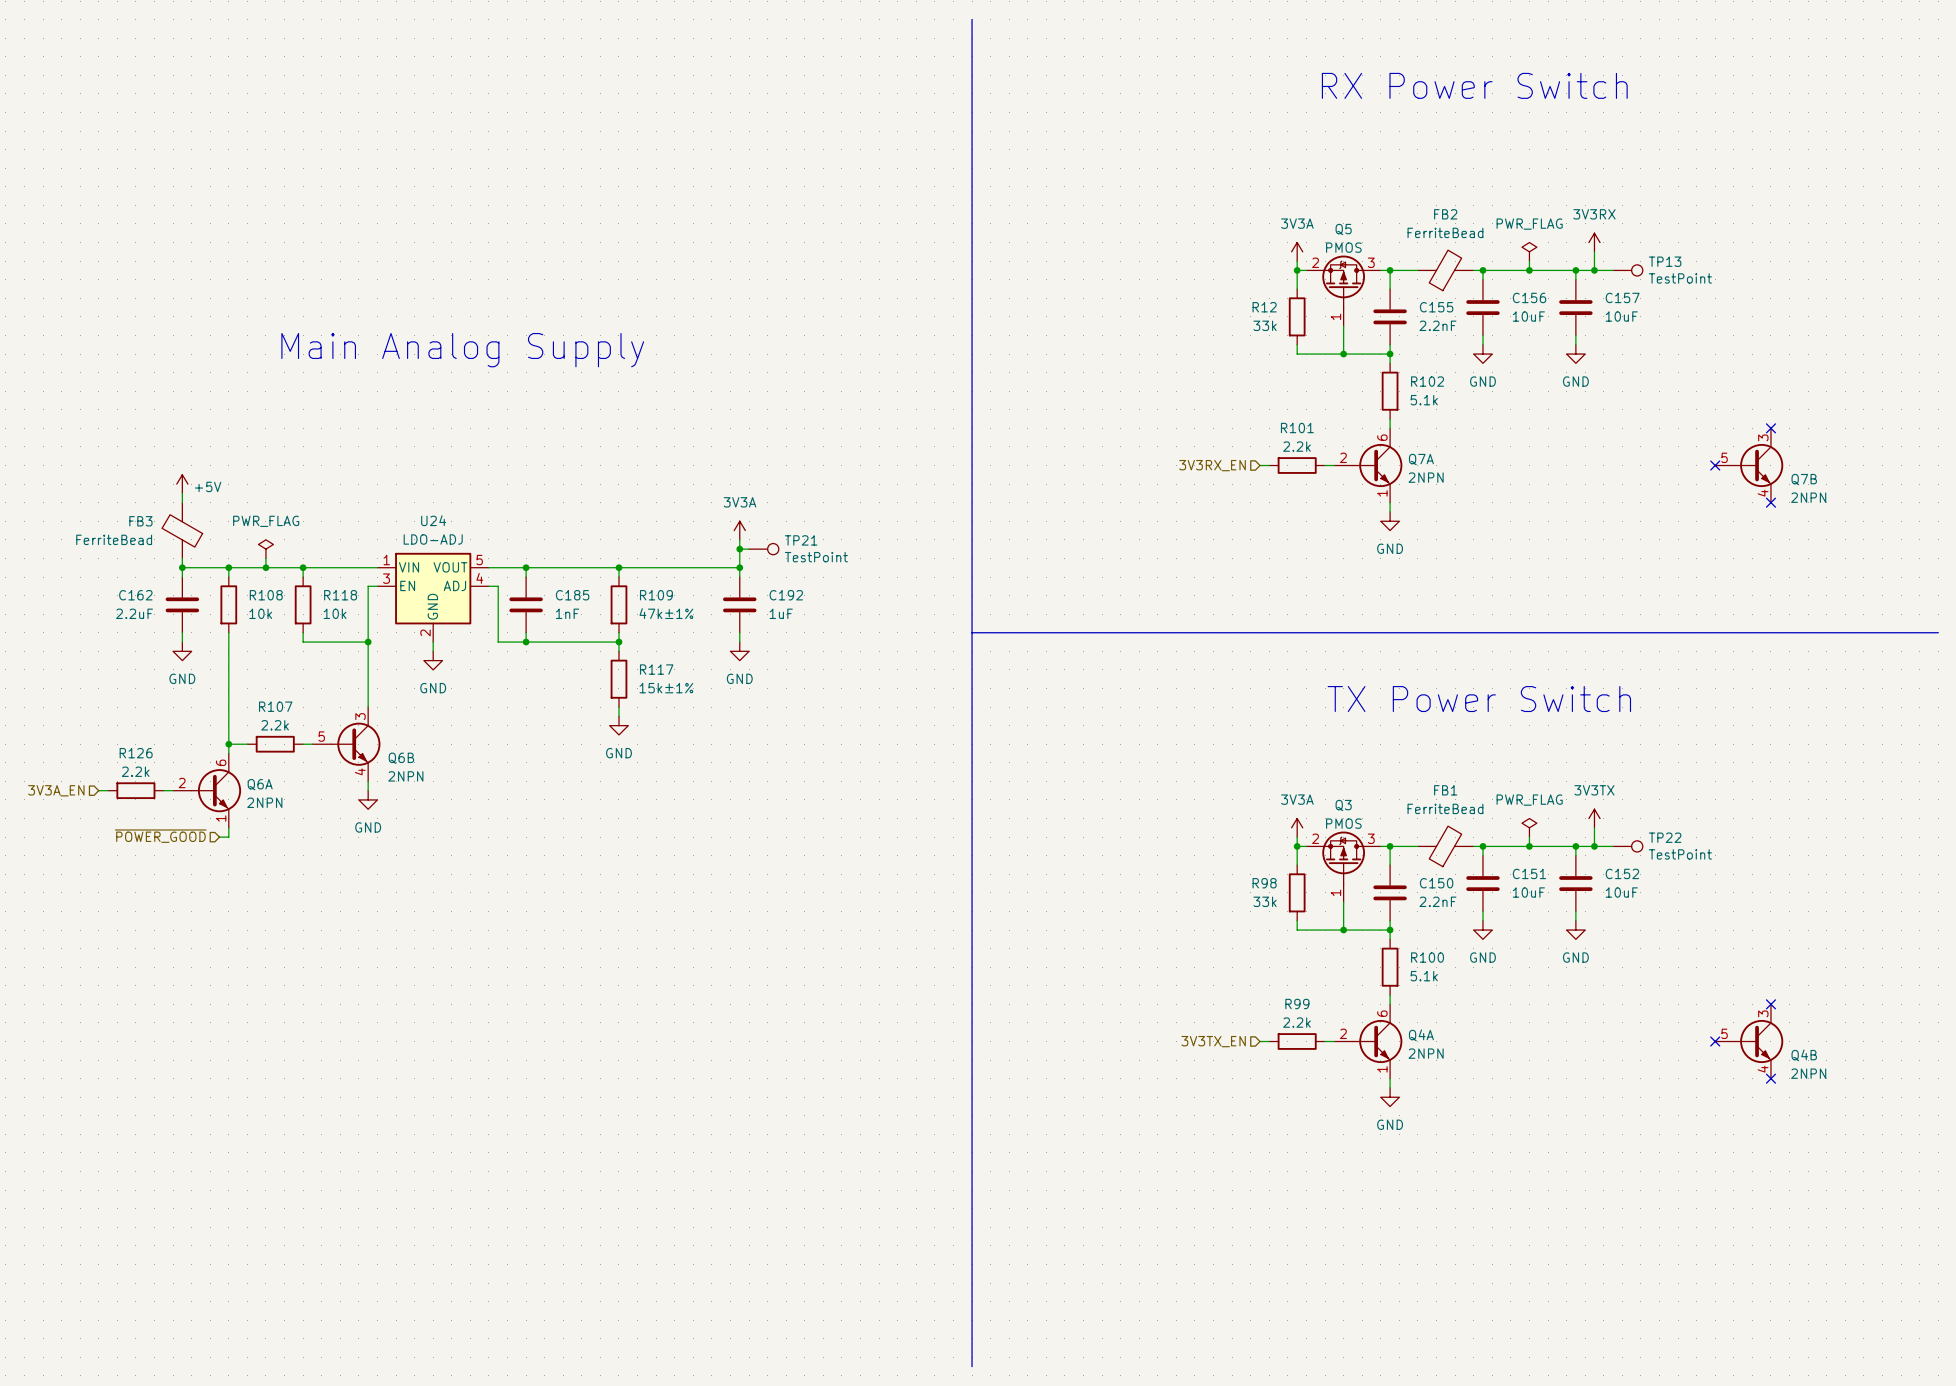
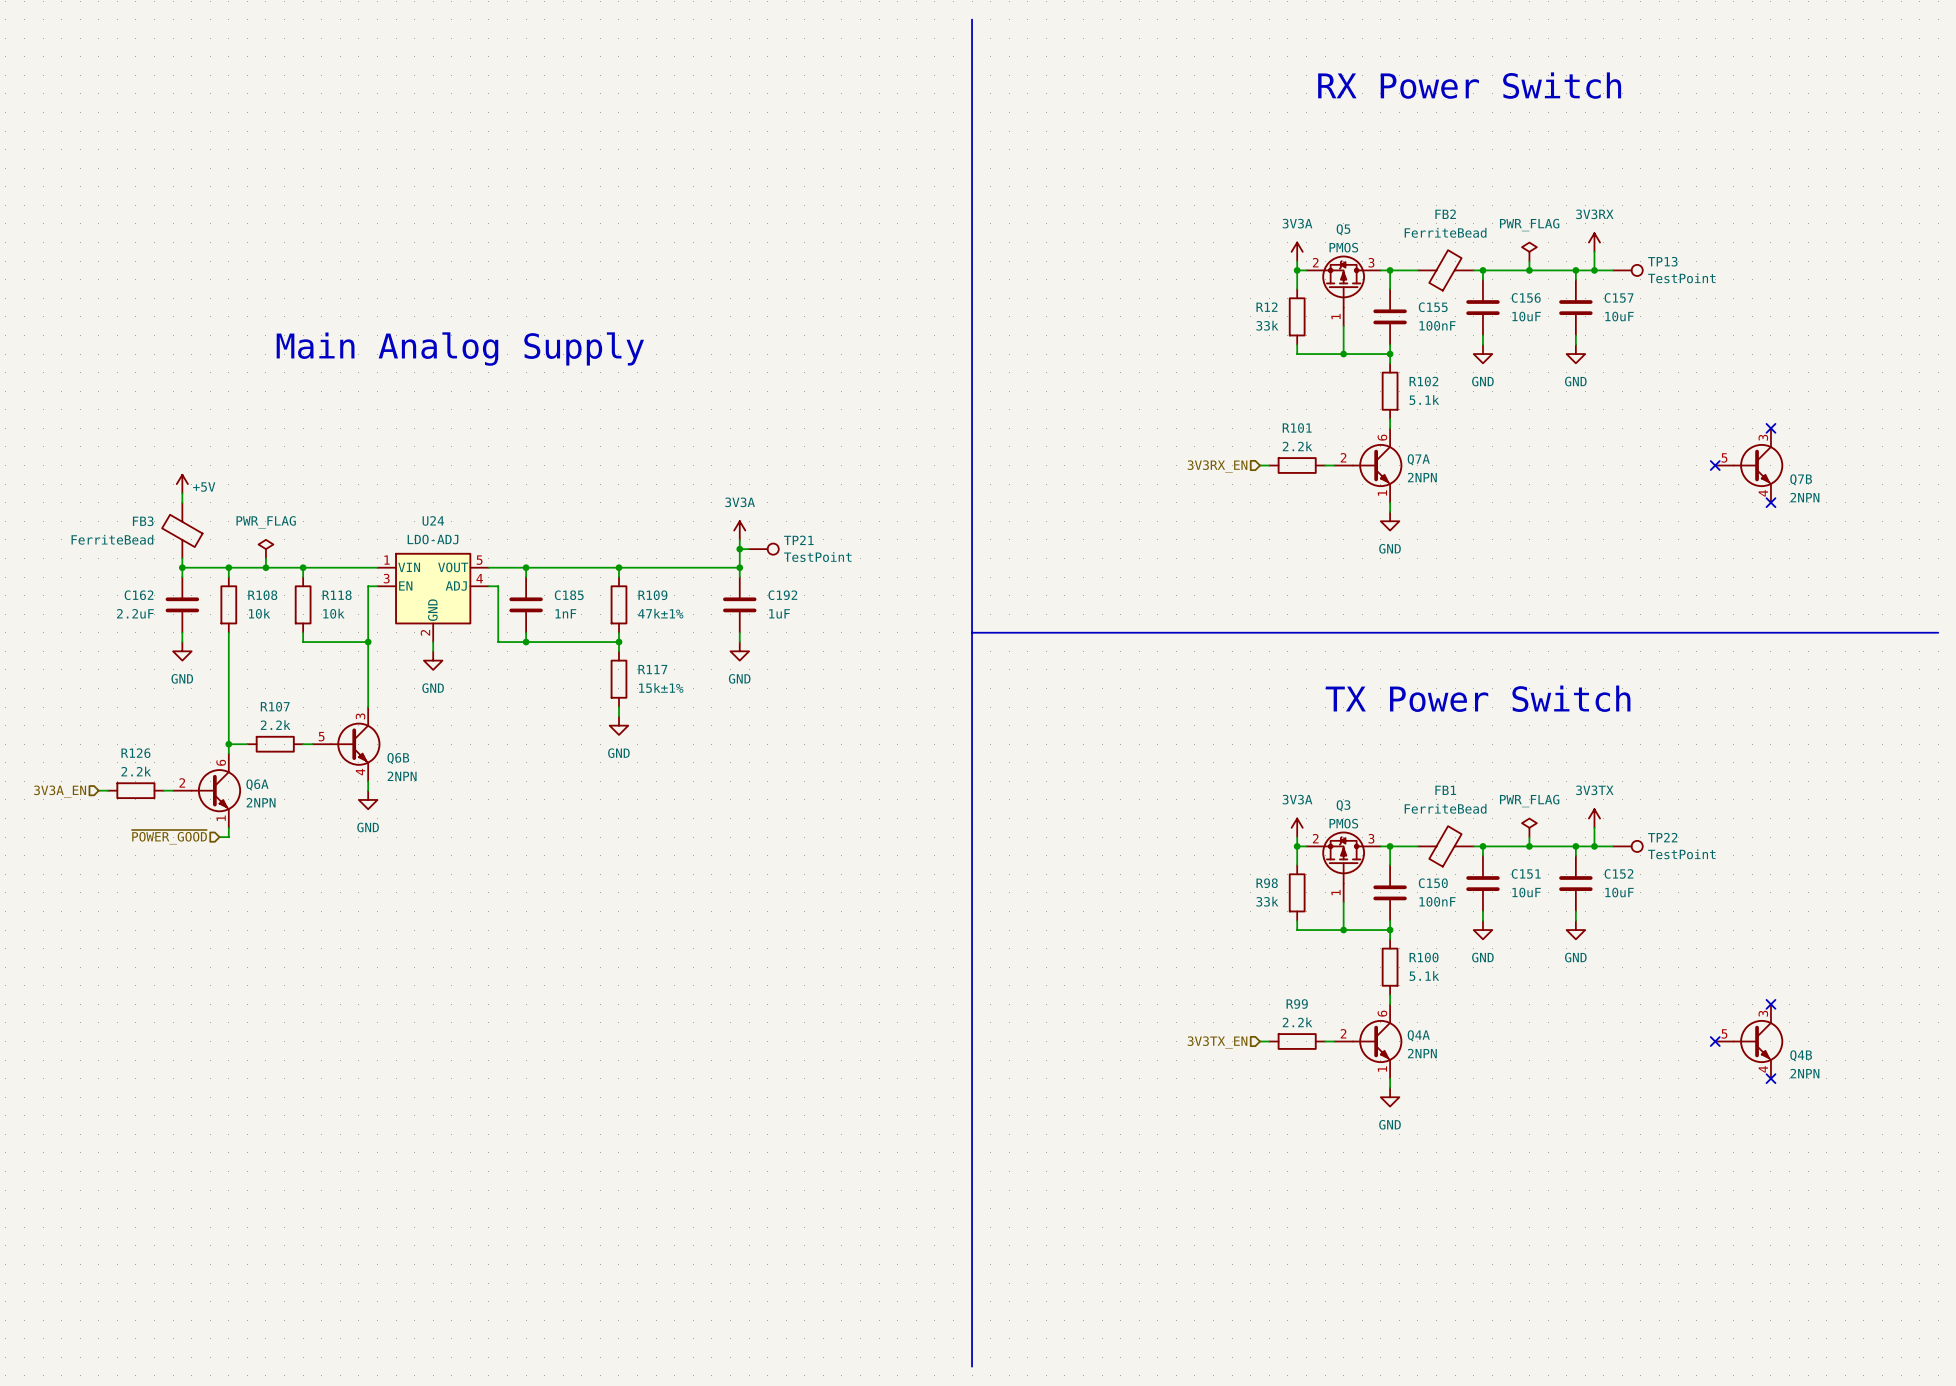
C155 value: 2.2nF (1437, 325) -> 100nF (1437, 325)
C150 value: 2.2nF (1437, 901) -> 100nF (1437, 901)

